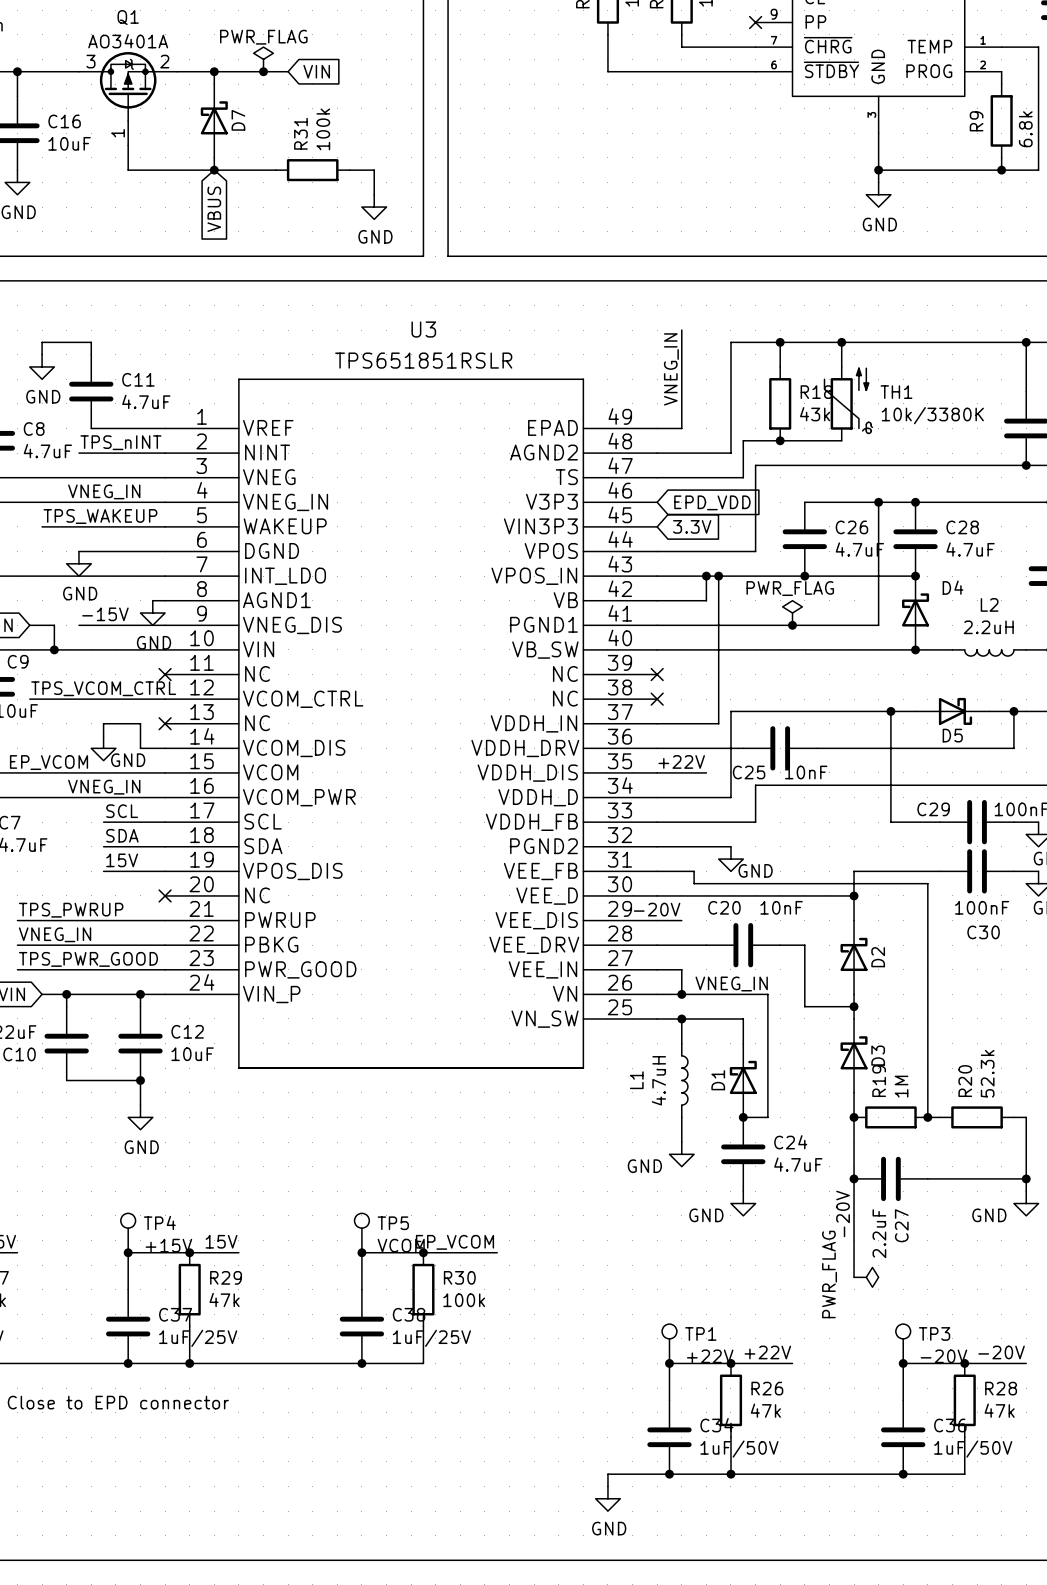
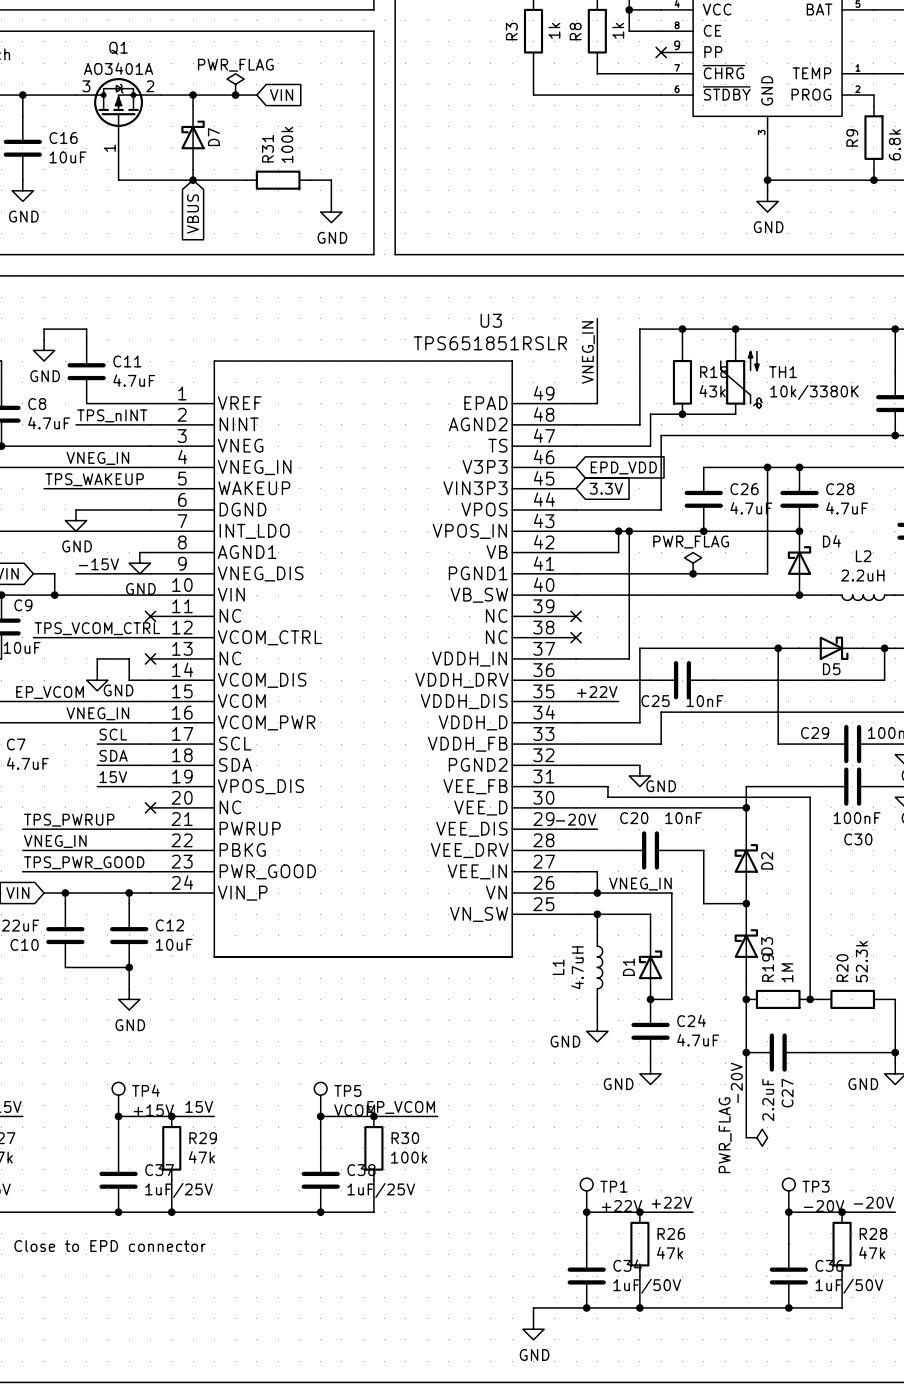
U3 name position: U3 (423, 329) -> U3 (491, 320)
U3 value position: TPS651851RSLR (423, 360) -> TPS651851RSLR (490, 343)

